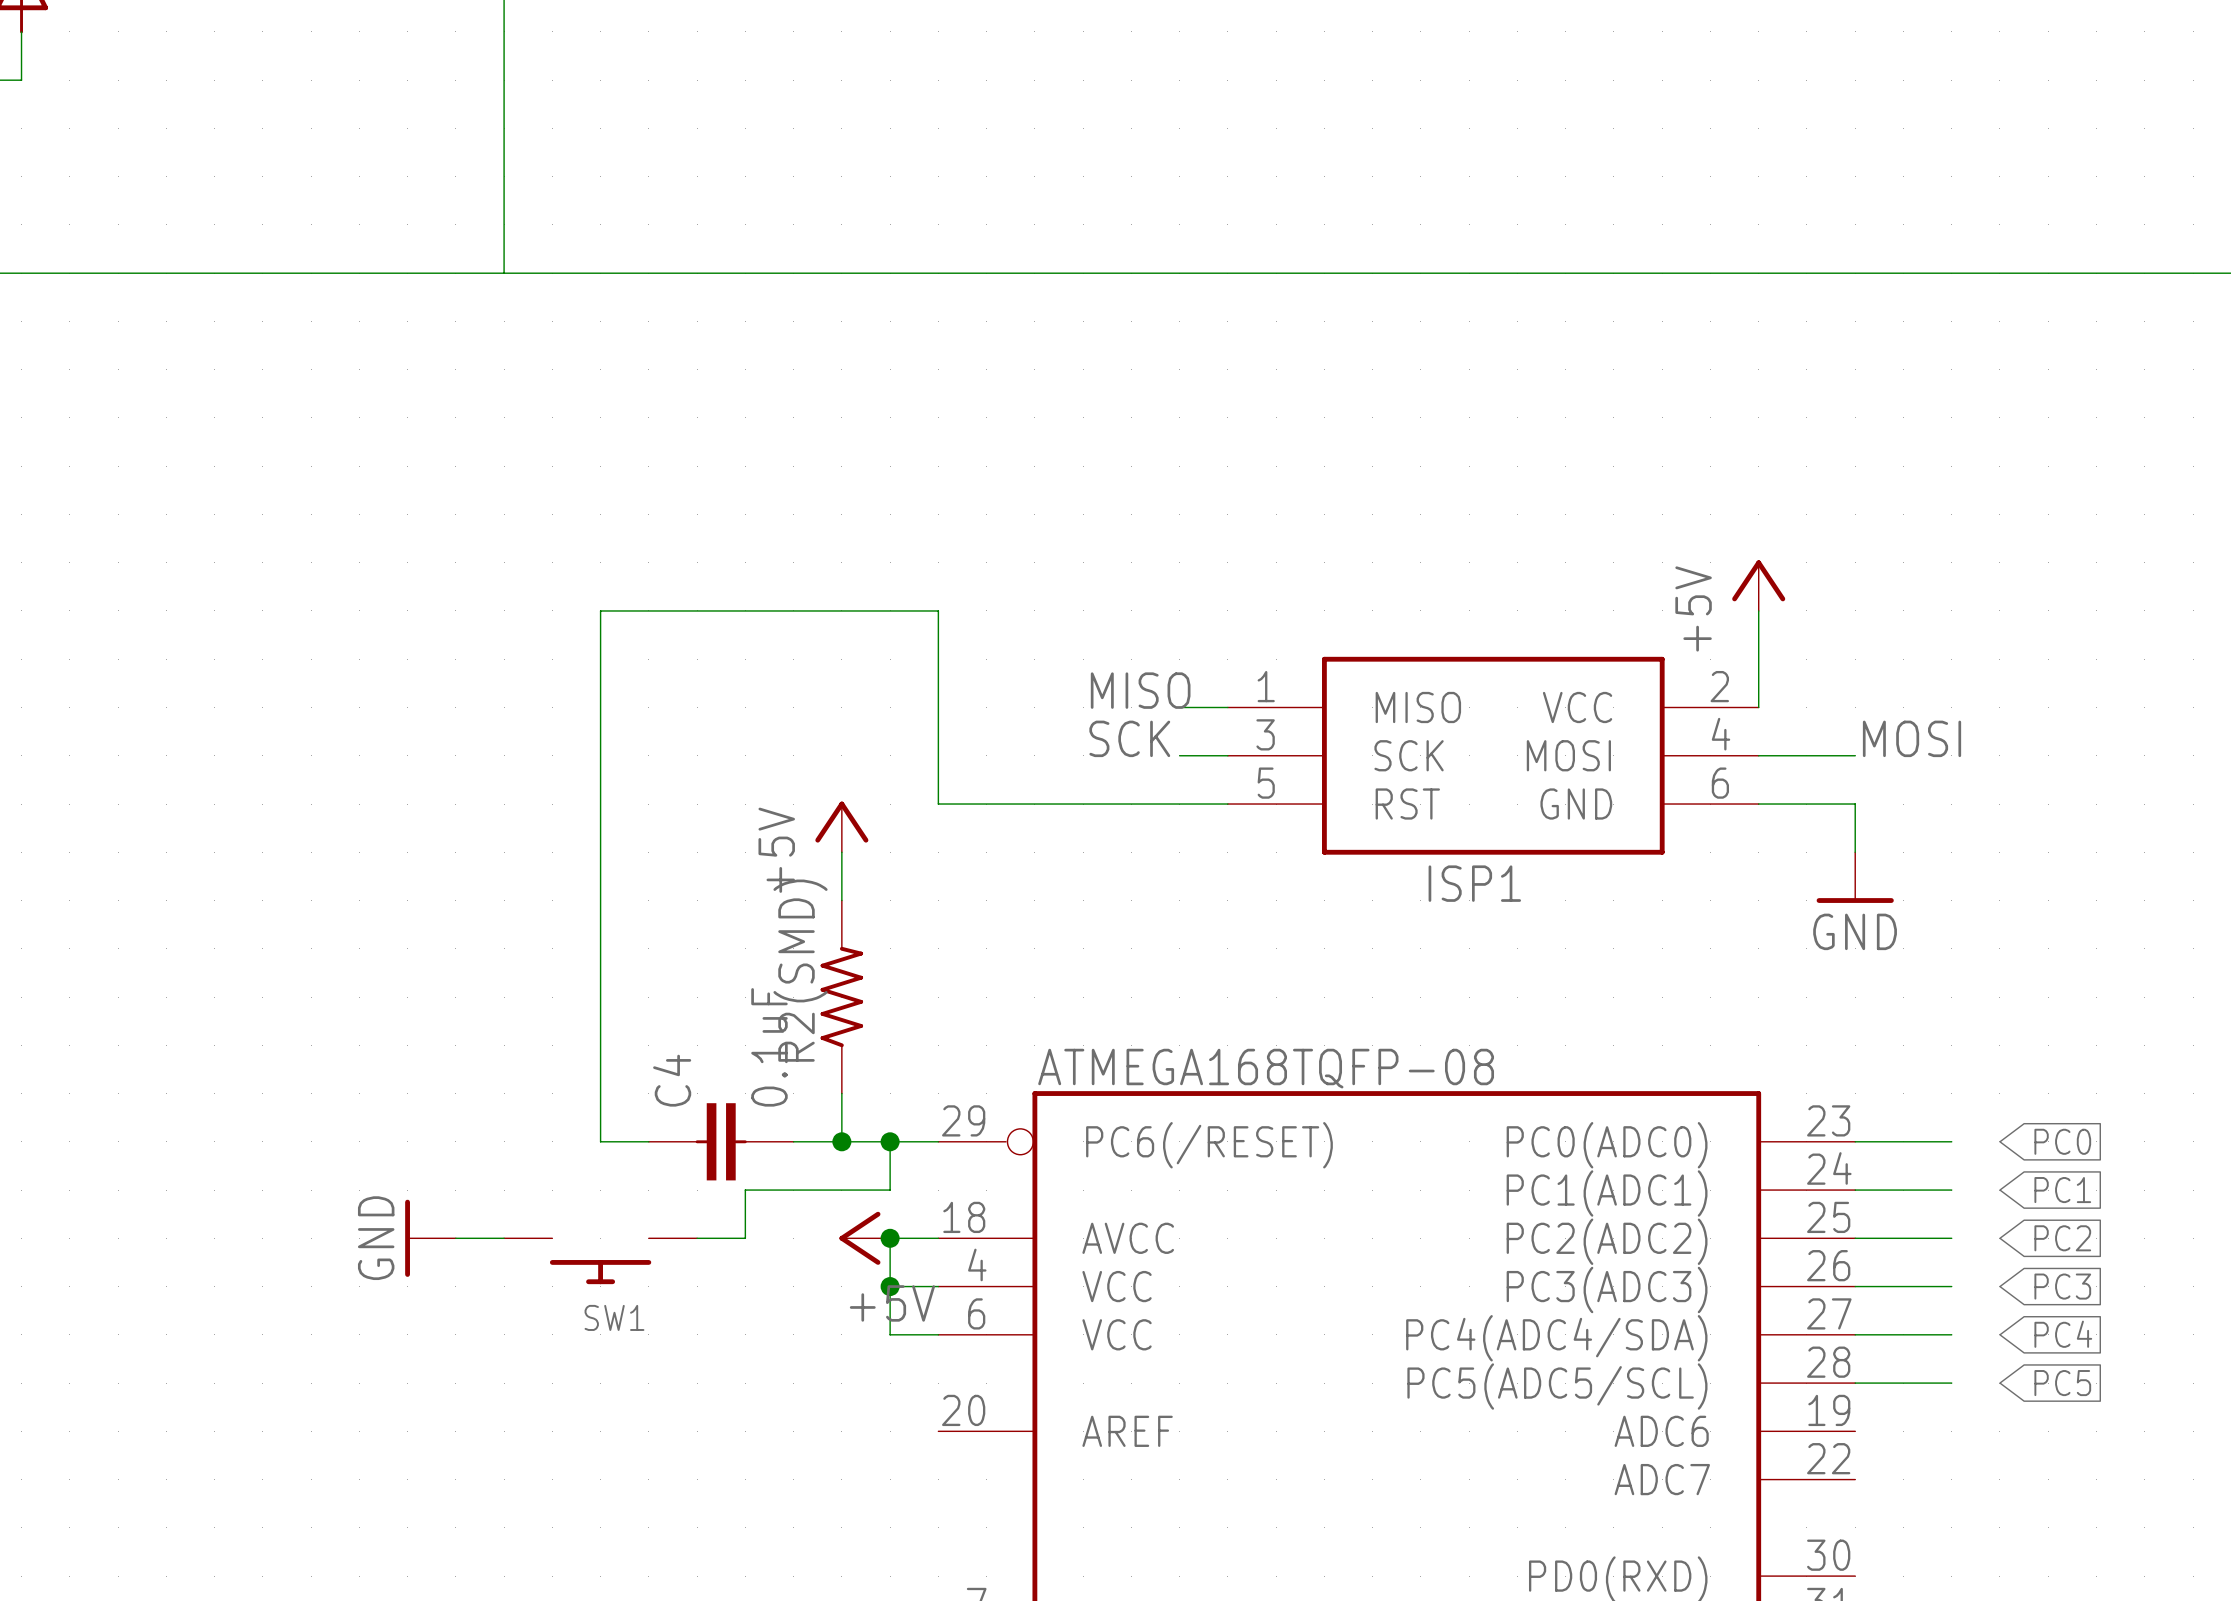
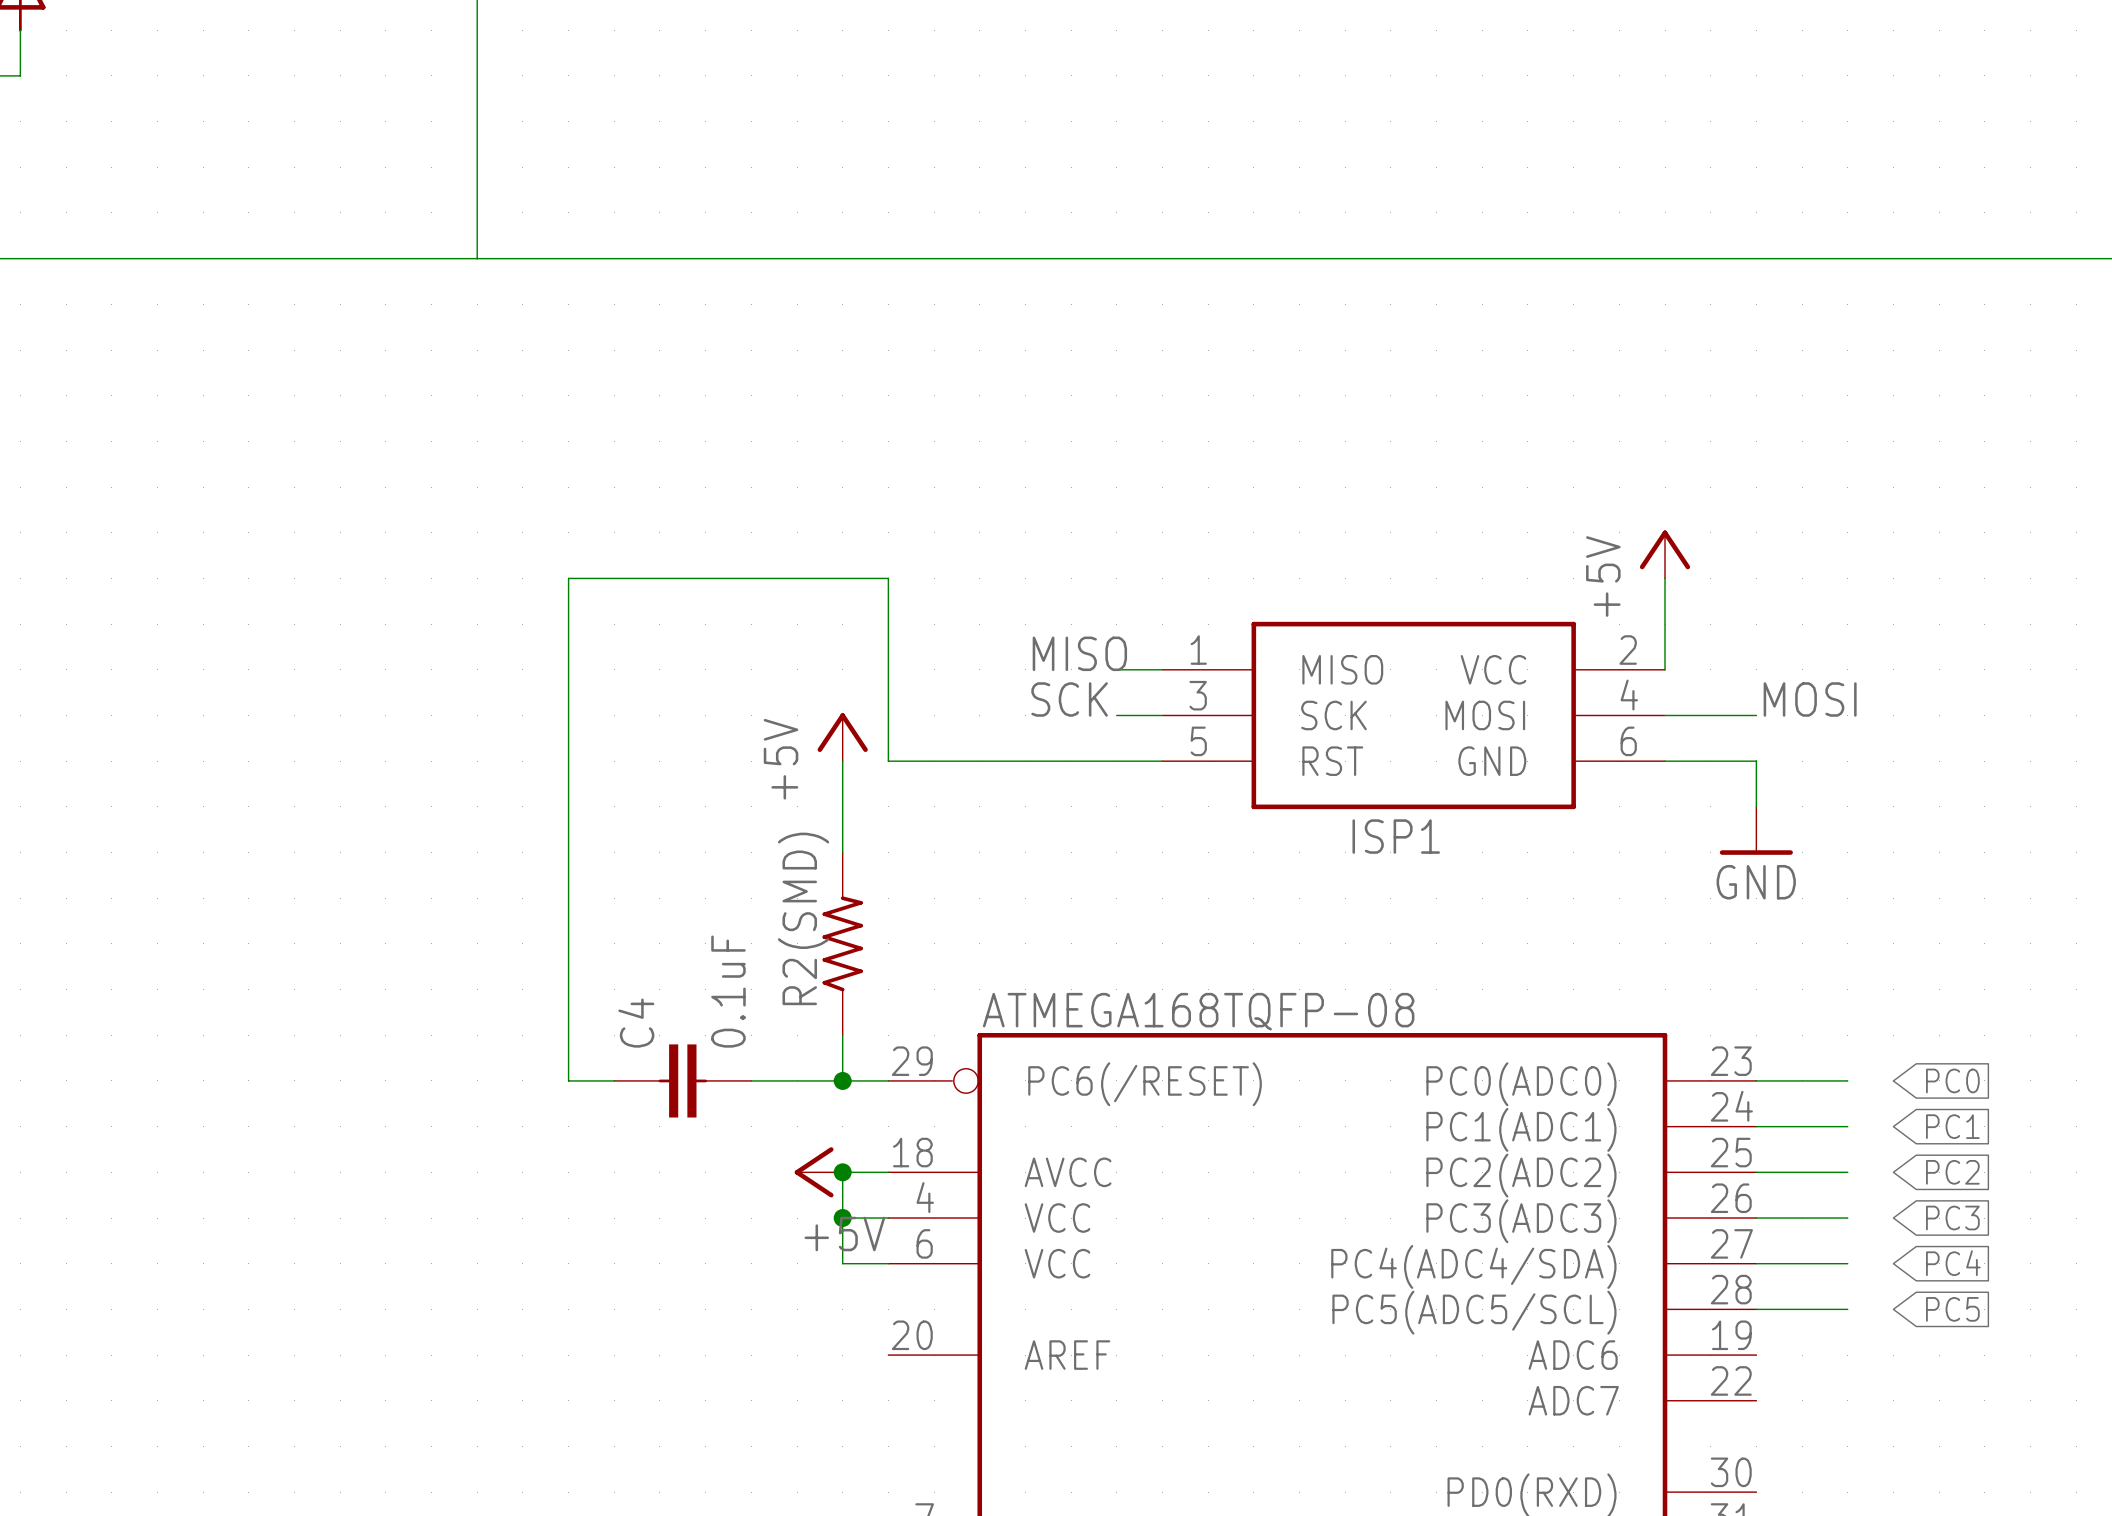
wire: none -> (842, 761) (842, 852)
power symbol position: +5V (841, 826) -> +5V (842, 737)
wire: (841, 852) (841, 900) -> none
R2(SMD) position: (841, 997) -> (842, 943)
wire: (841, 1093) (841, 1141) -> none
junction: (841, 1141) -> none
wire: (890, 1141) (890, 1190) (745, 1190) (745, 1238) (697, 1238) -> (842, 1080) (842, 1035)
power symbol: GND (430, 1238) -> none
wire: (455, 1238) (504, 1238) -> none
SW1: (600, 1261) -> none

